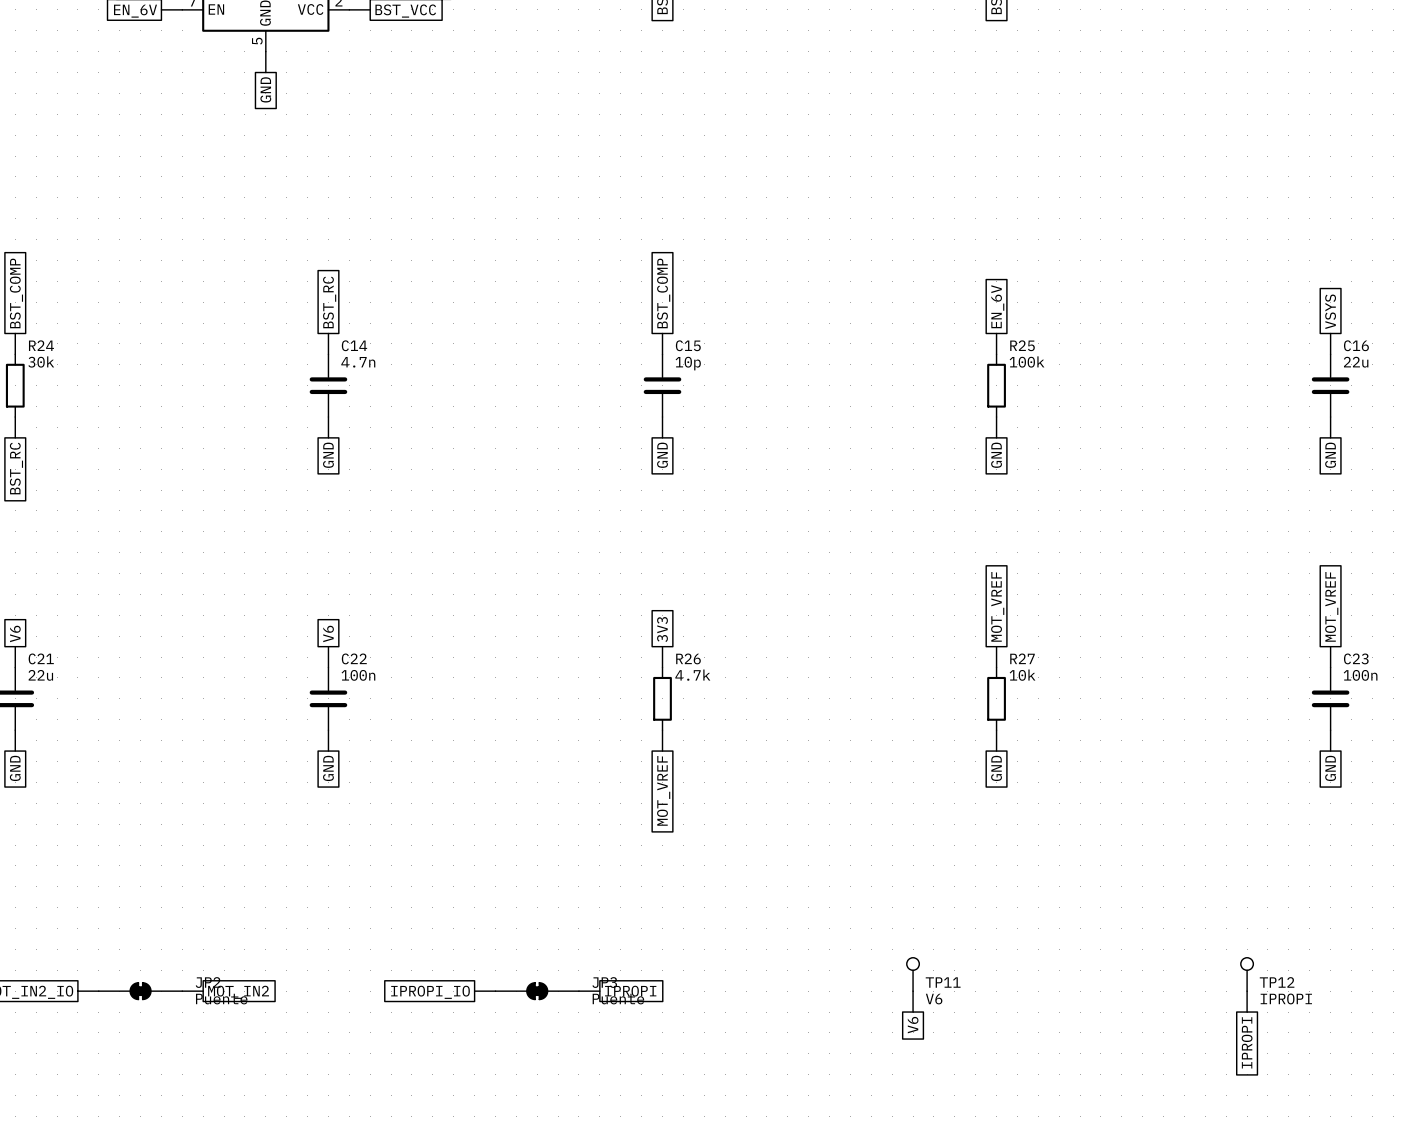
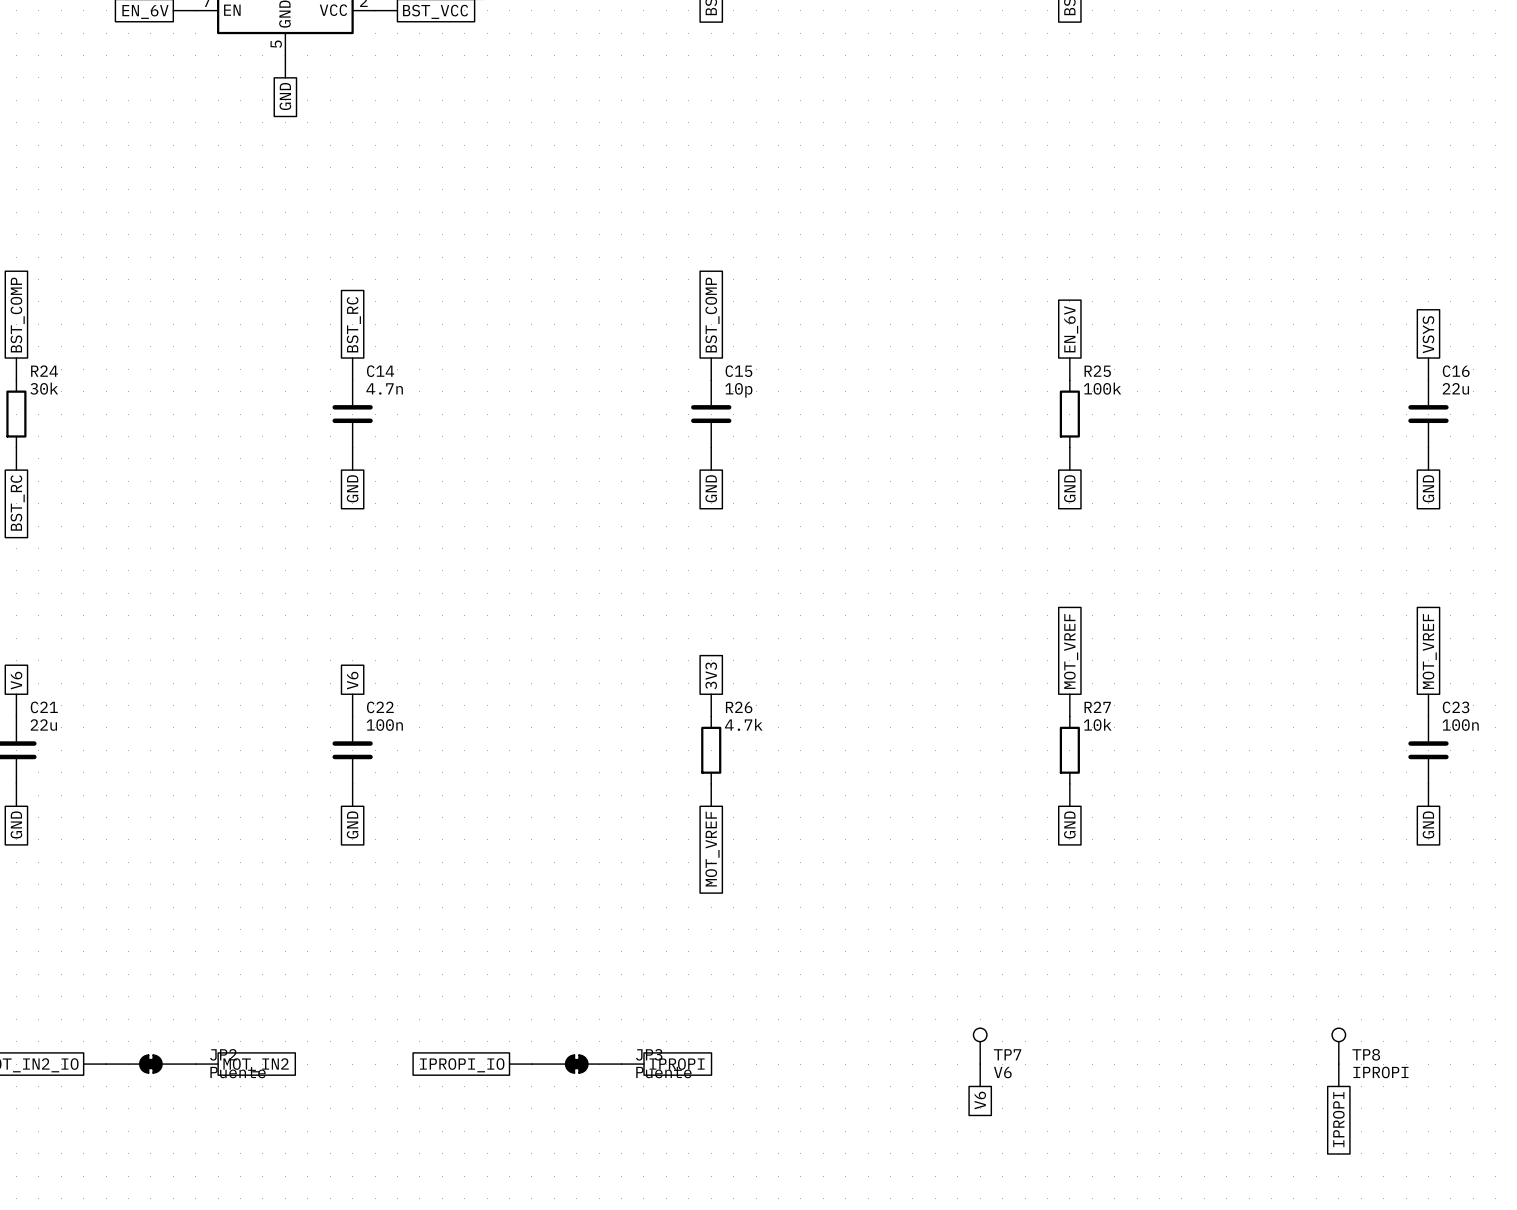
TP11 name: TP11 (943, 982) -> TP7 (1007, 1054)
TP12 name: TP12 (1277, 982) -> TP8 (1366, 1054)

